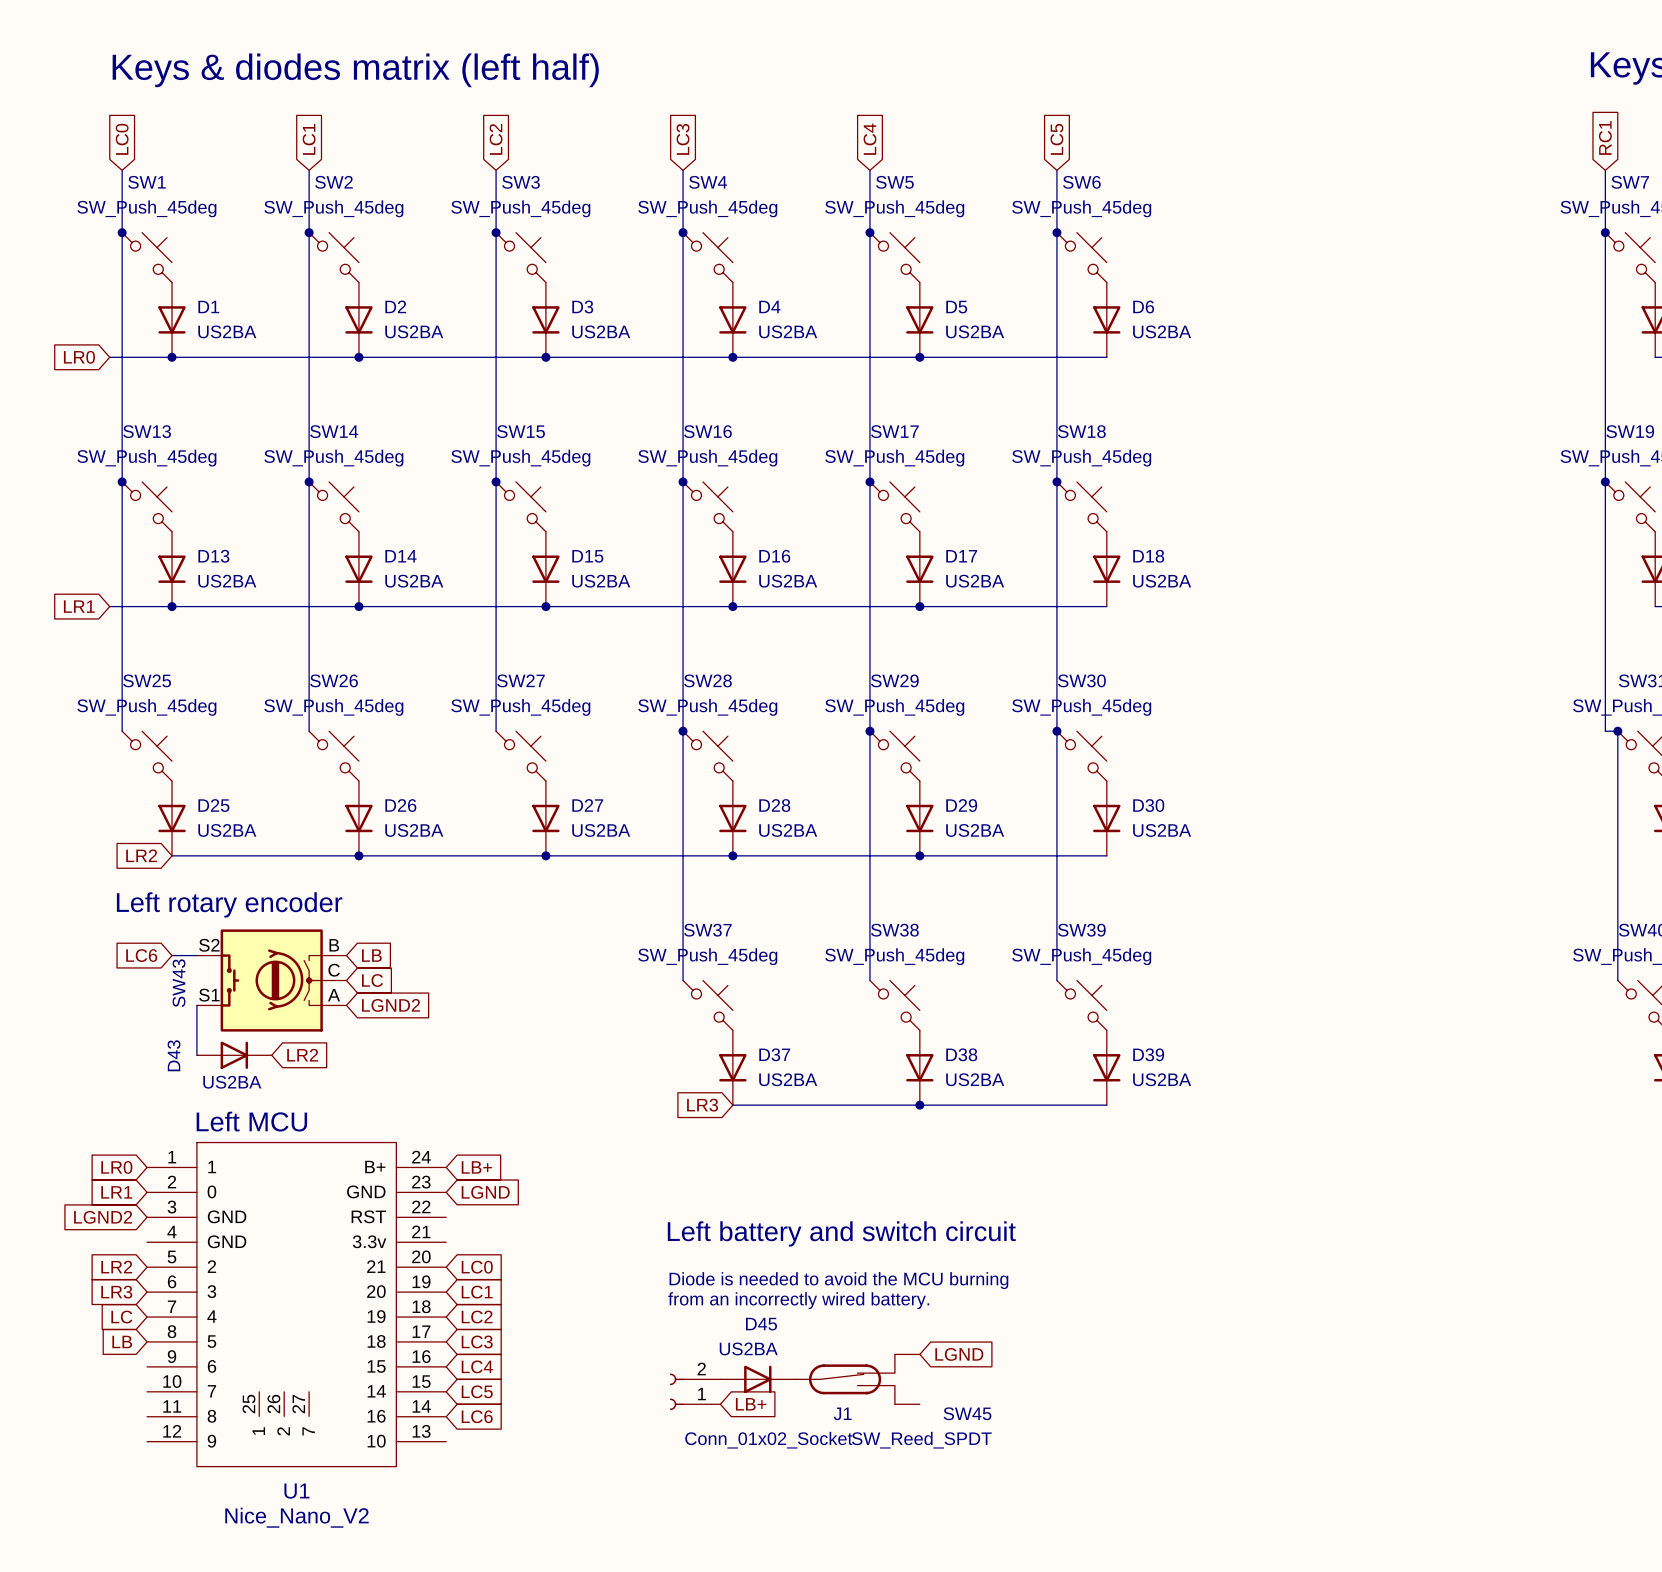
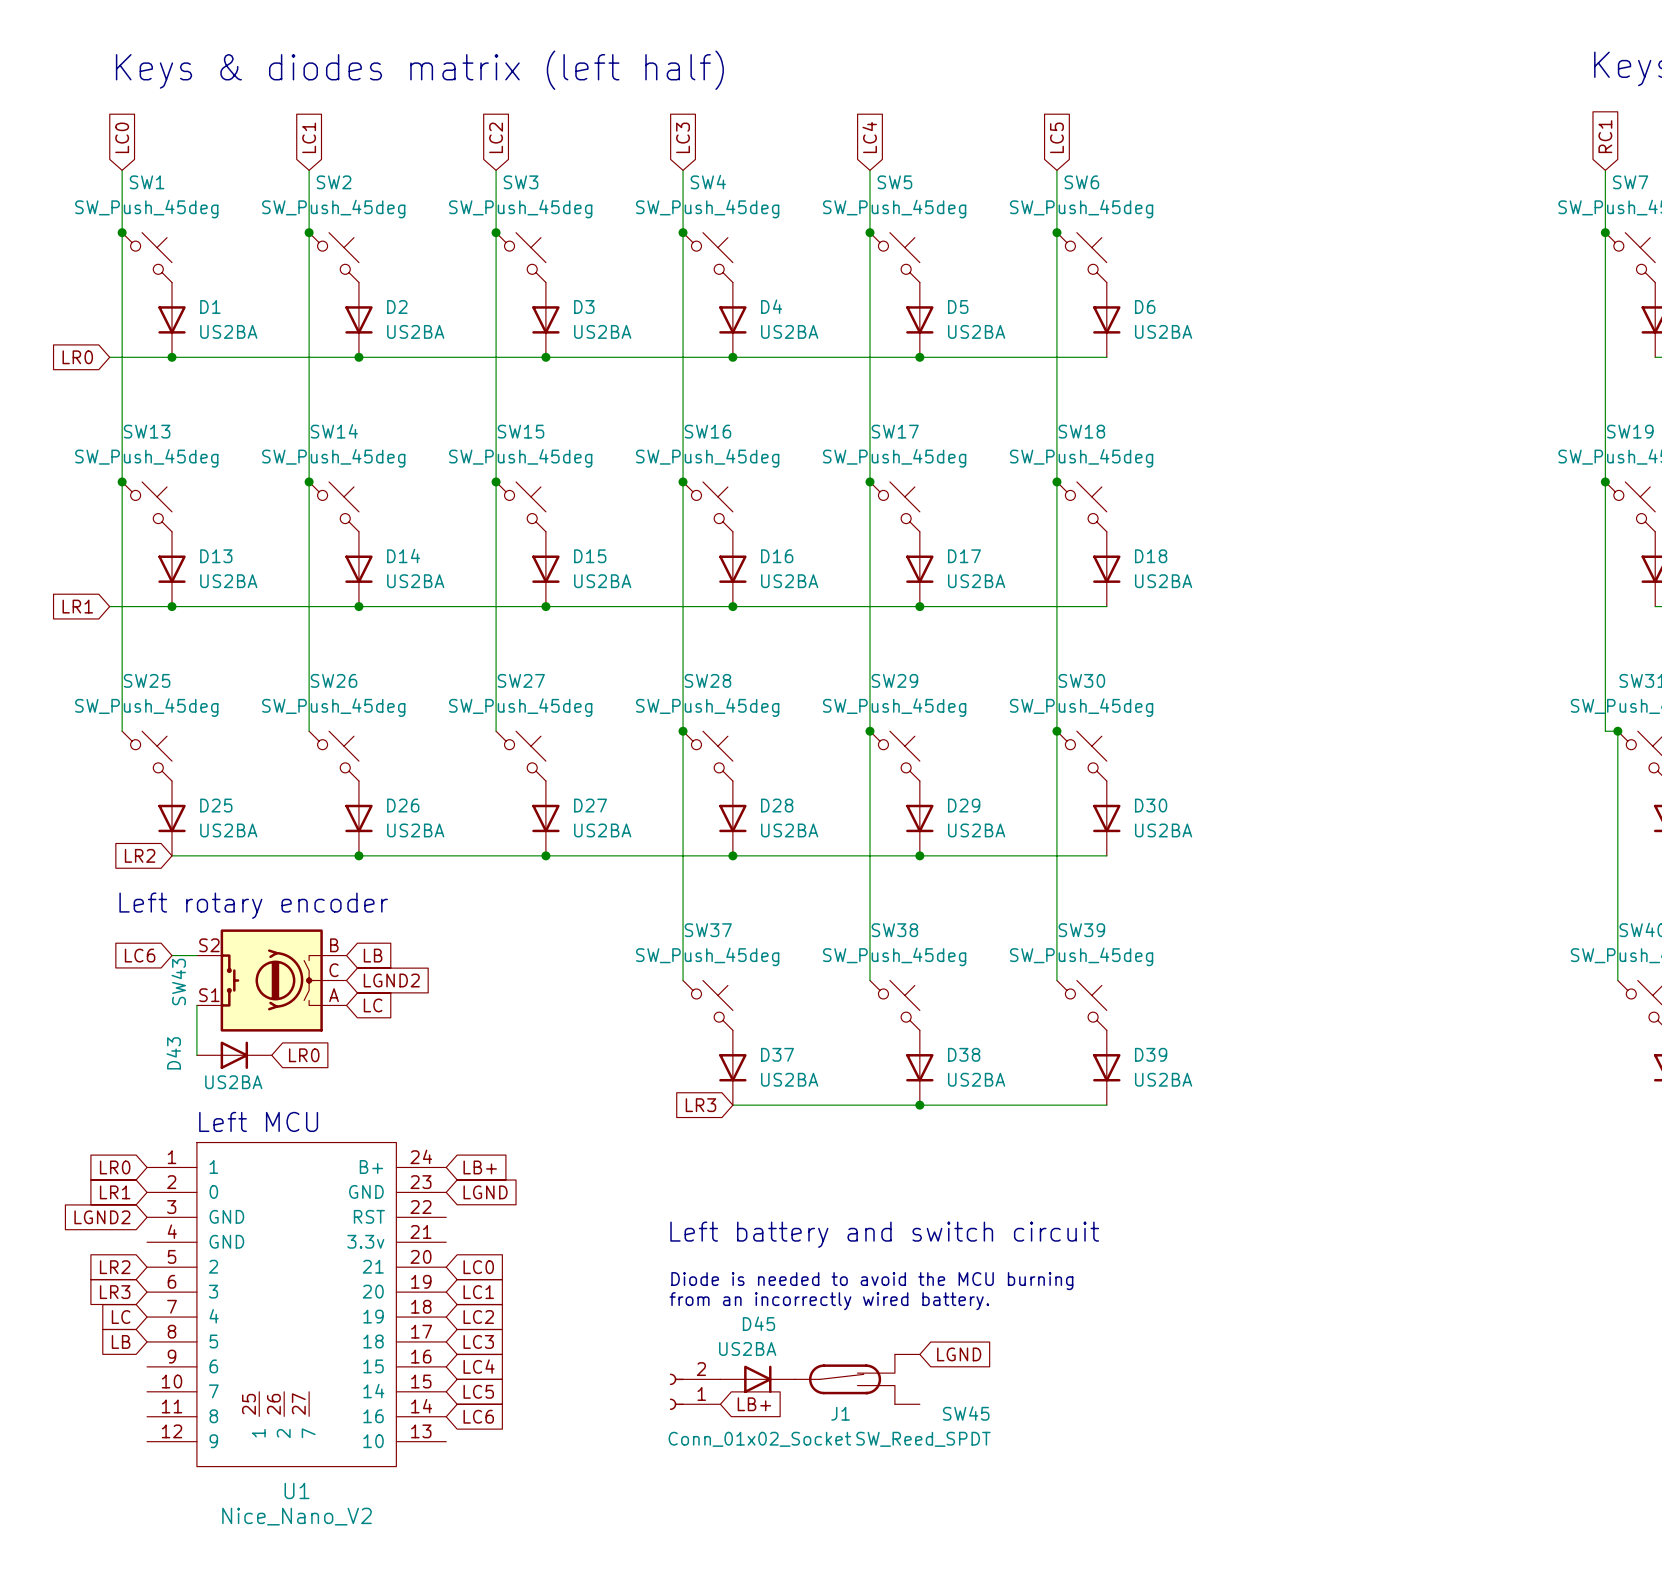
global label: LC (372, 980) -> LGND2 (391, 980)
global label: LGND2 (391, 1005) -> LC (373, 1005)
global label: LR2 (302, 1055) -> LR0 (304, 1055)

